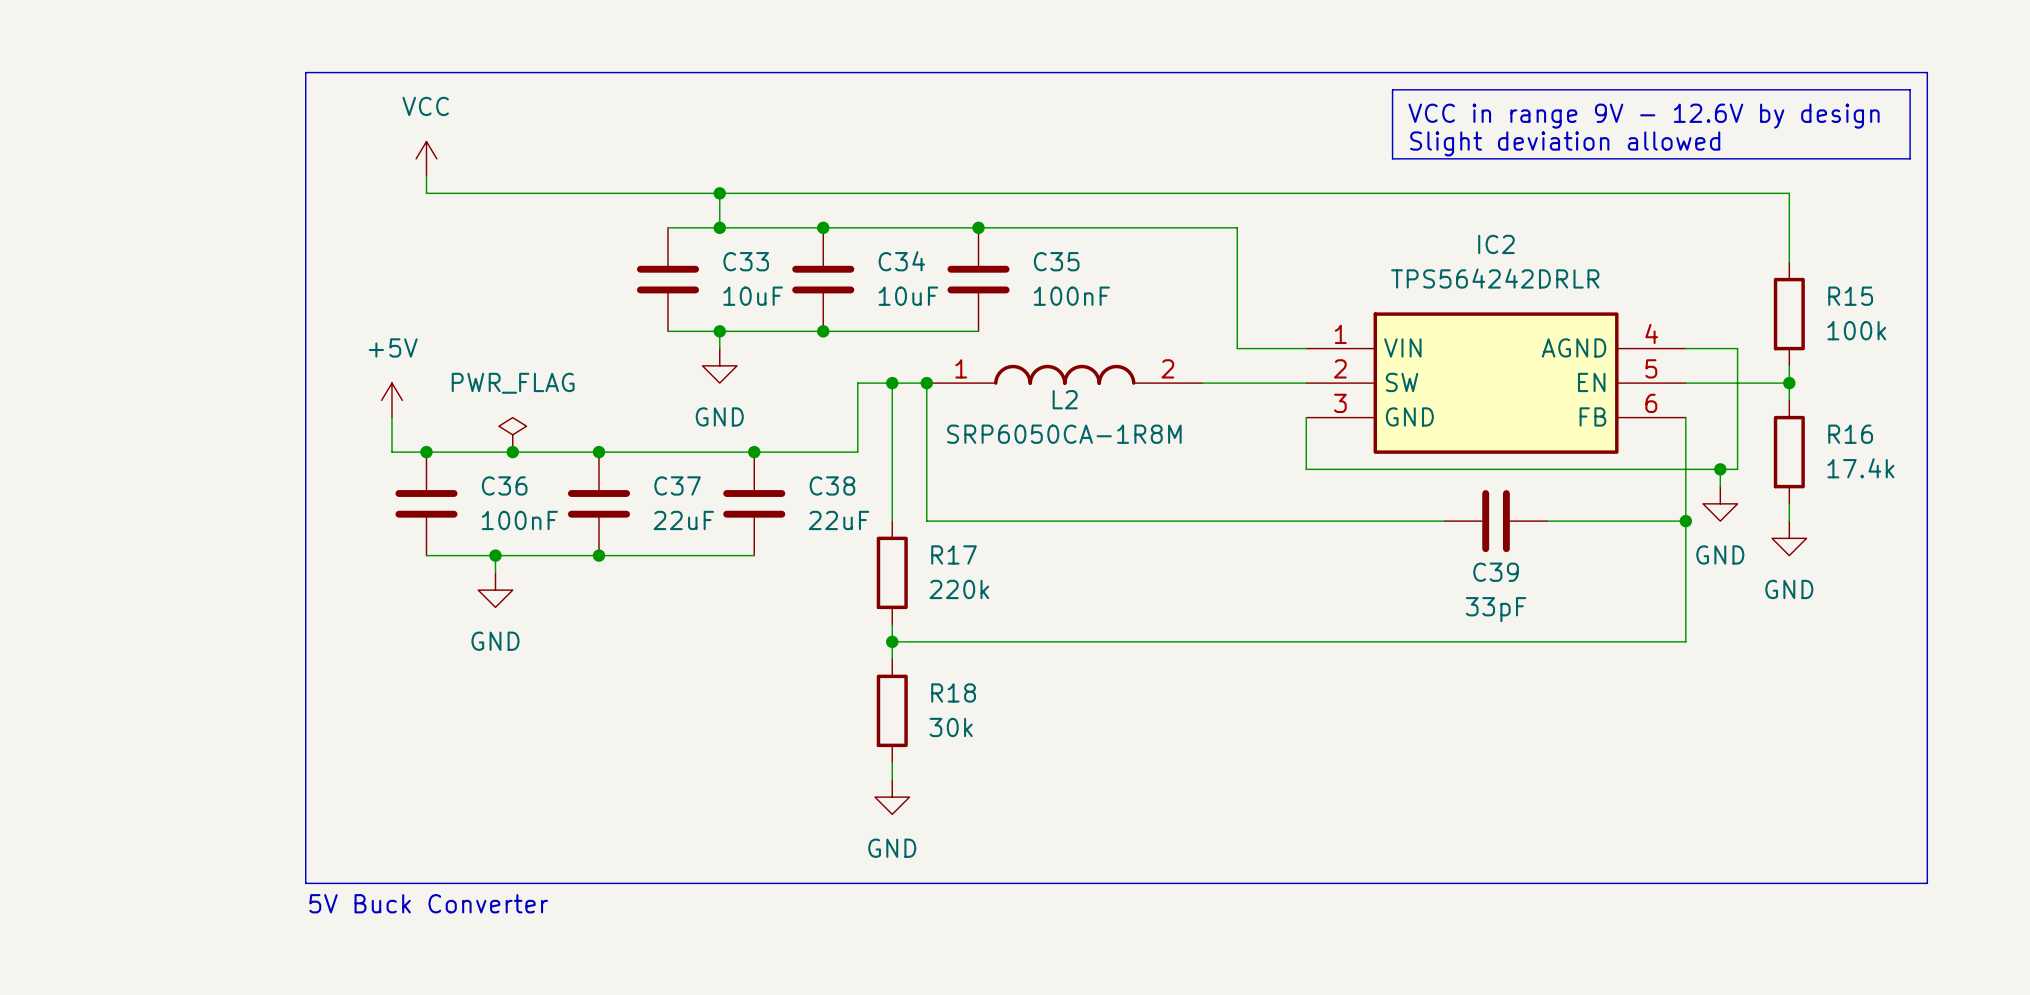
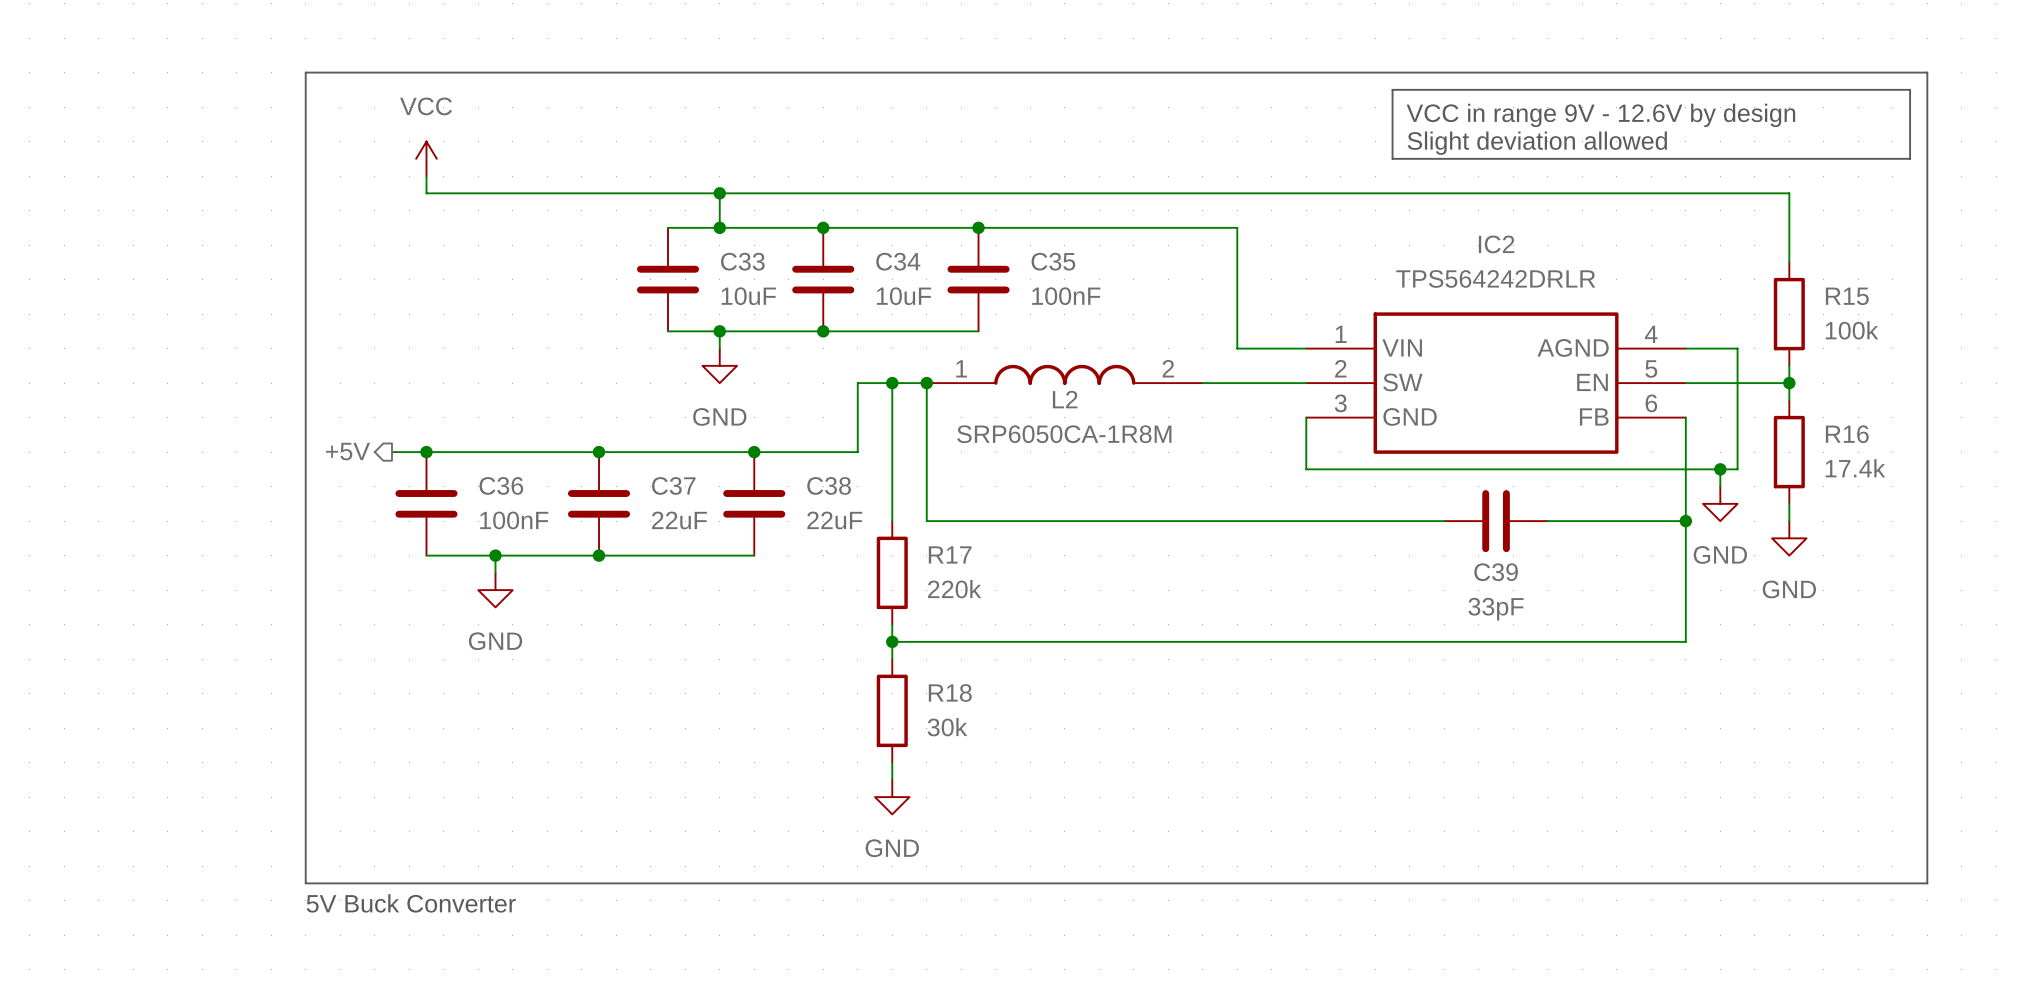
power symbol: +5V (391, 400) -> none
wire: (391, 417) (391, 452) -> none
power symbol: PWR_FLAG (512, 434) -> none
hierarchical label: none -> +5V (347, 451)
junction: (512, 452) -> none

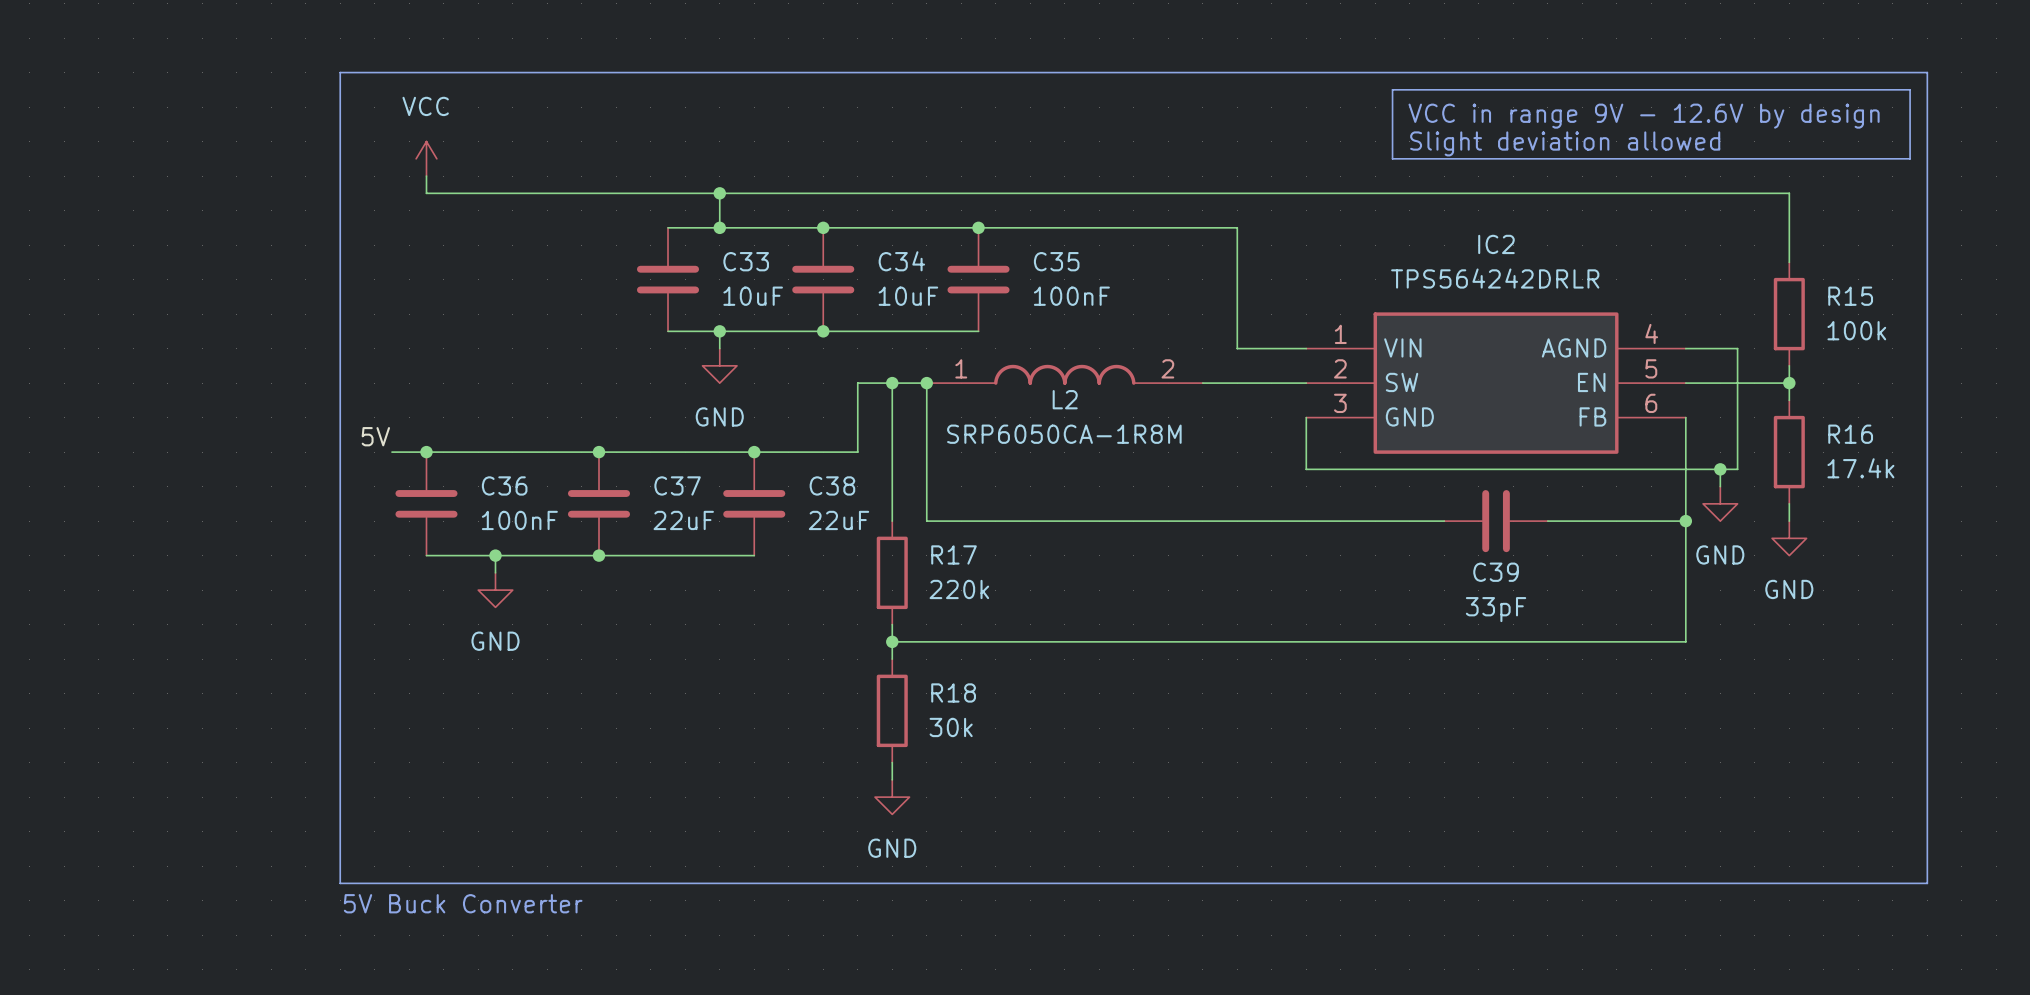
line: (340, 72) (305, 72) (305, 883) (340, 883) -> (340, 72) (340, 883)
label: none -> 5V (375, 436)
hierarchical label: +5V (347, 451) -> none
text position: 5V Buck Converter (411, 903) -> 5V Buck Converter (463, 903)

